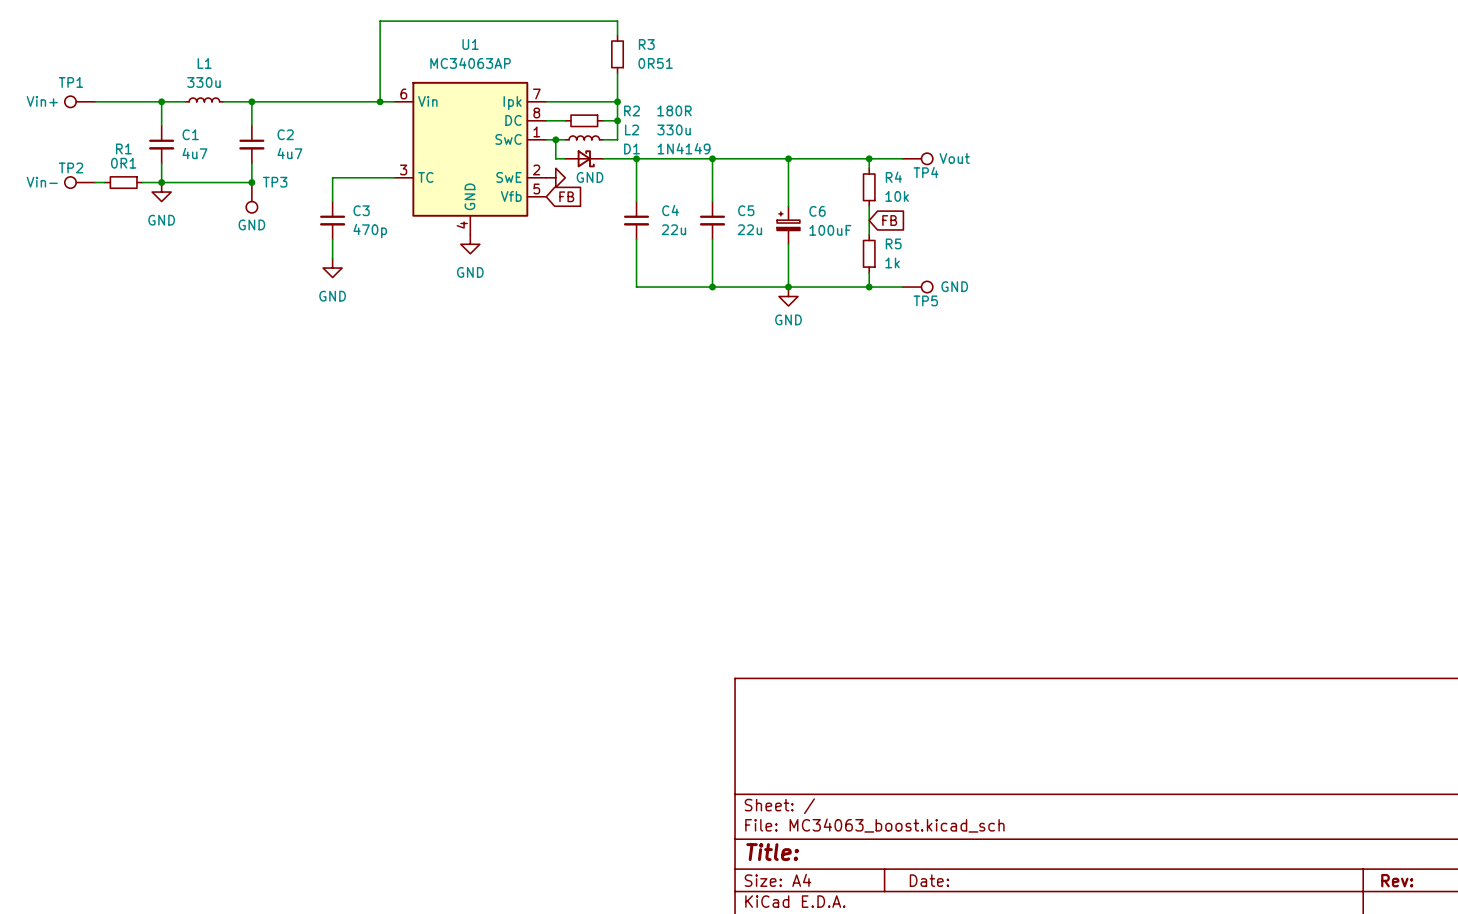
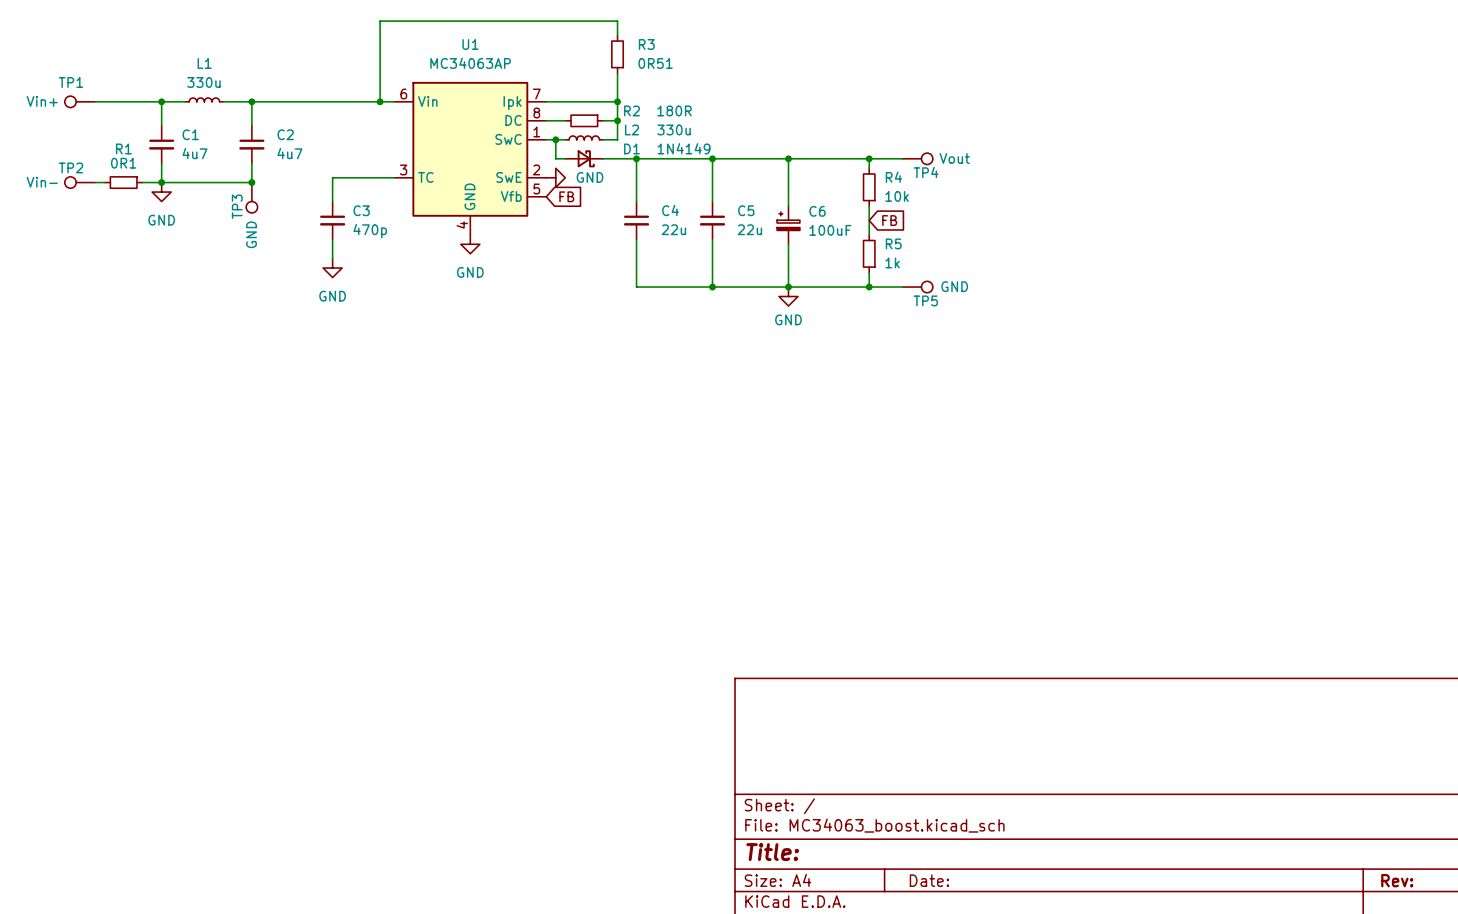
TP3 name rotation: 0° (275, 182) -> 90° counterclockwise (237, 206)
TP3 name position: TP3 (275, 182) -> TP3 (237, 206)
TP3 value rotation: 0° (251, 224) -> 90° counterclockwise (251, 234)

